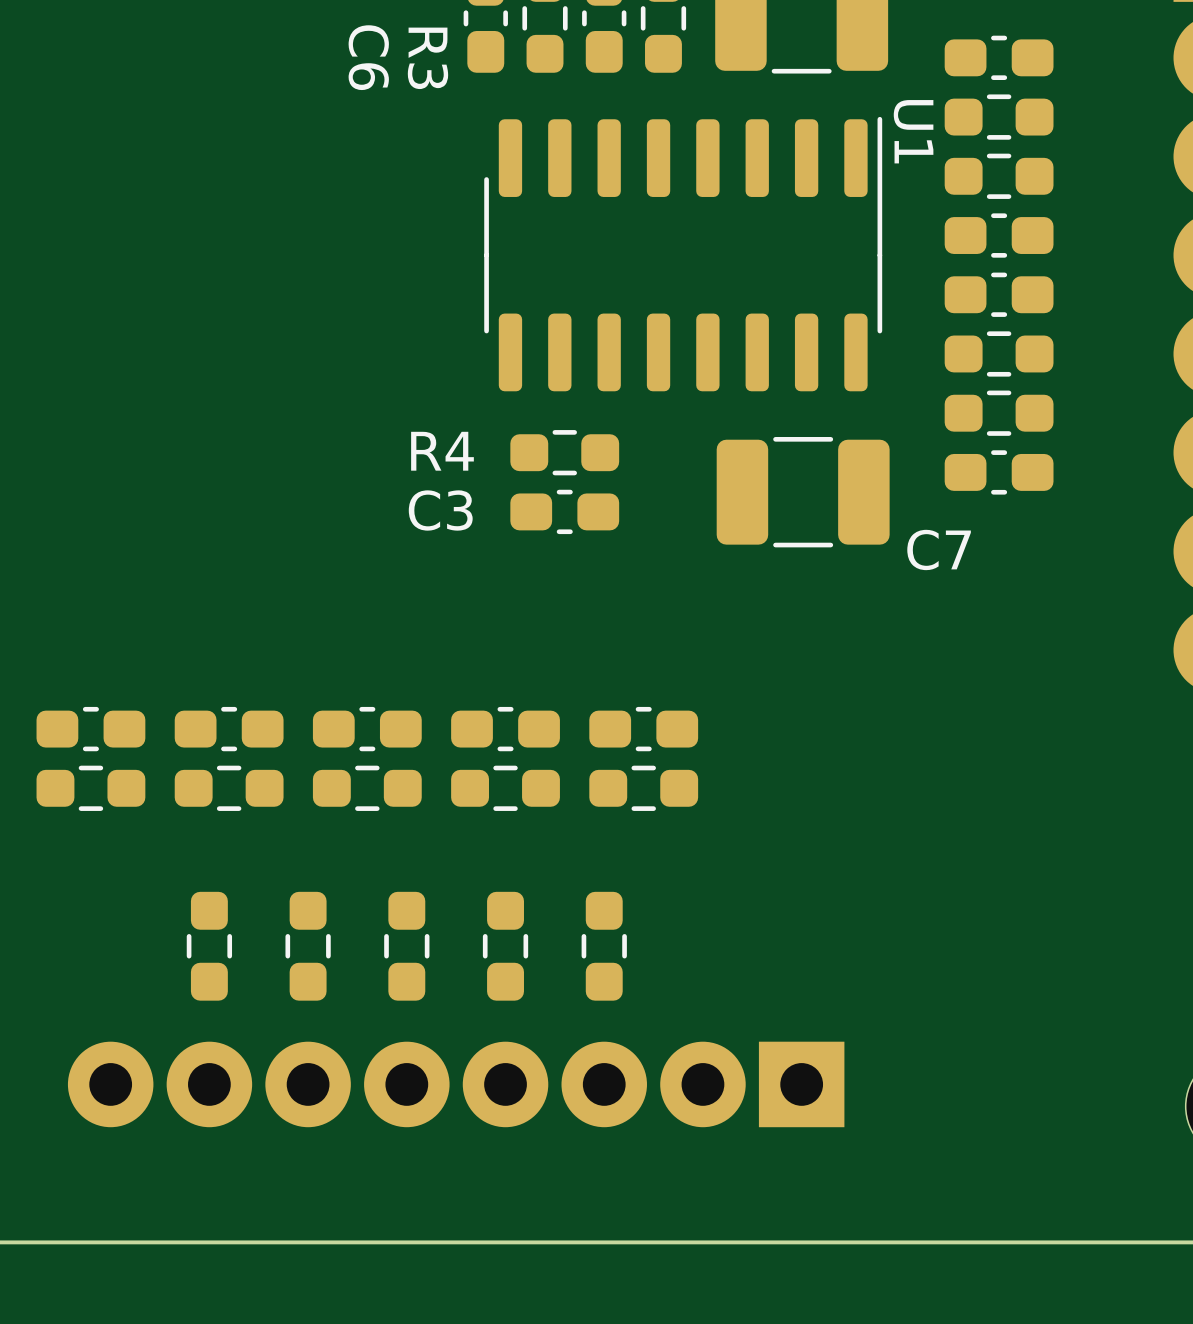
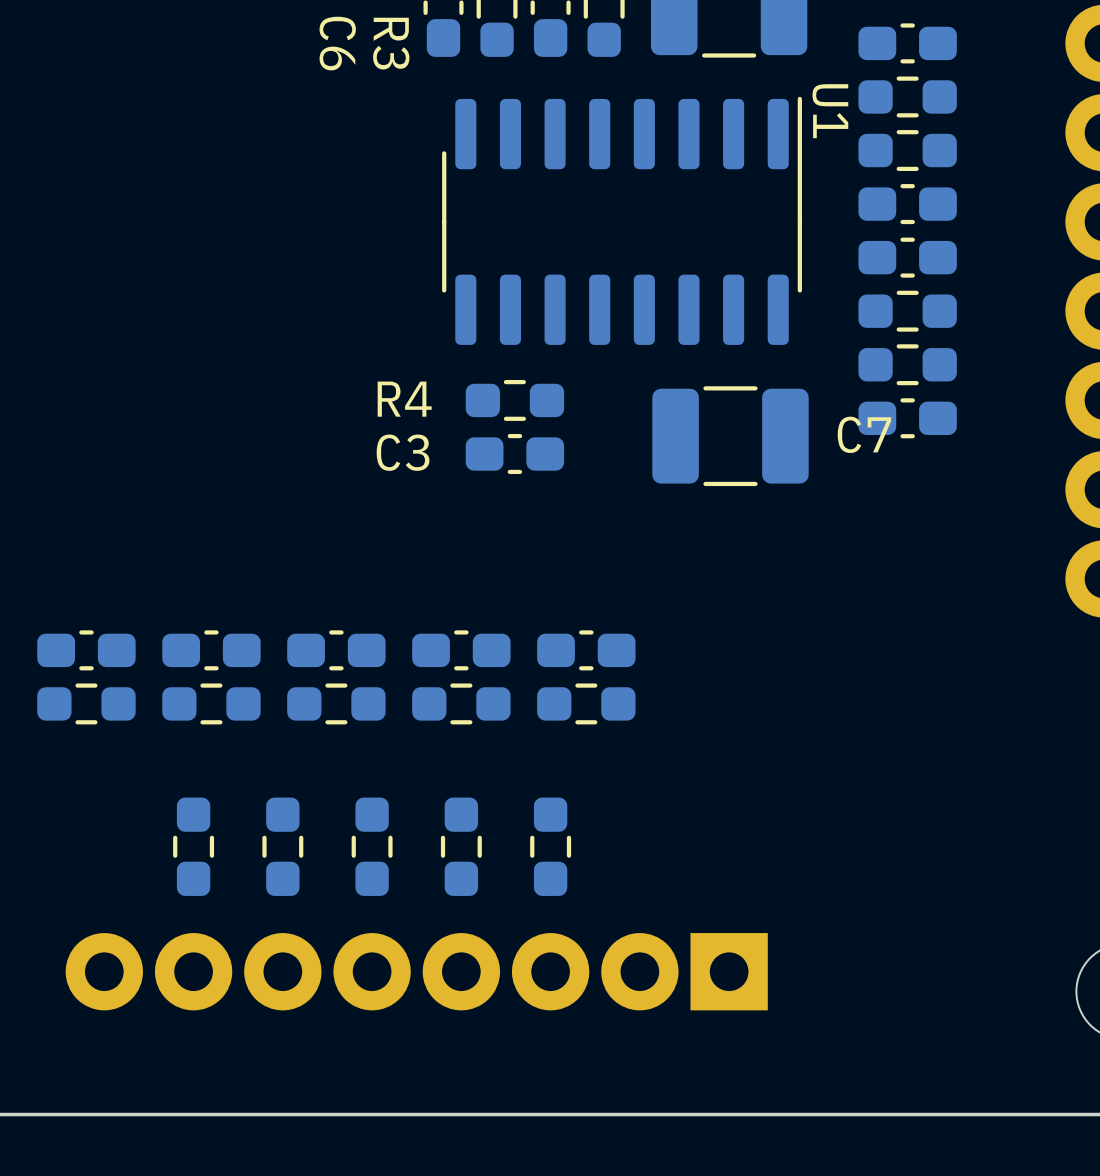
C7 name position: C7 (939, 549) -> C7 (864, 434)

